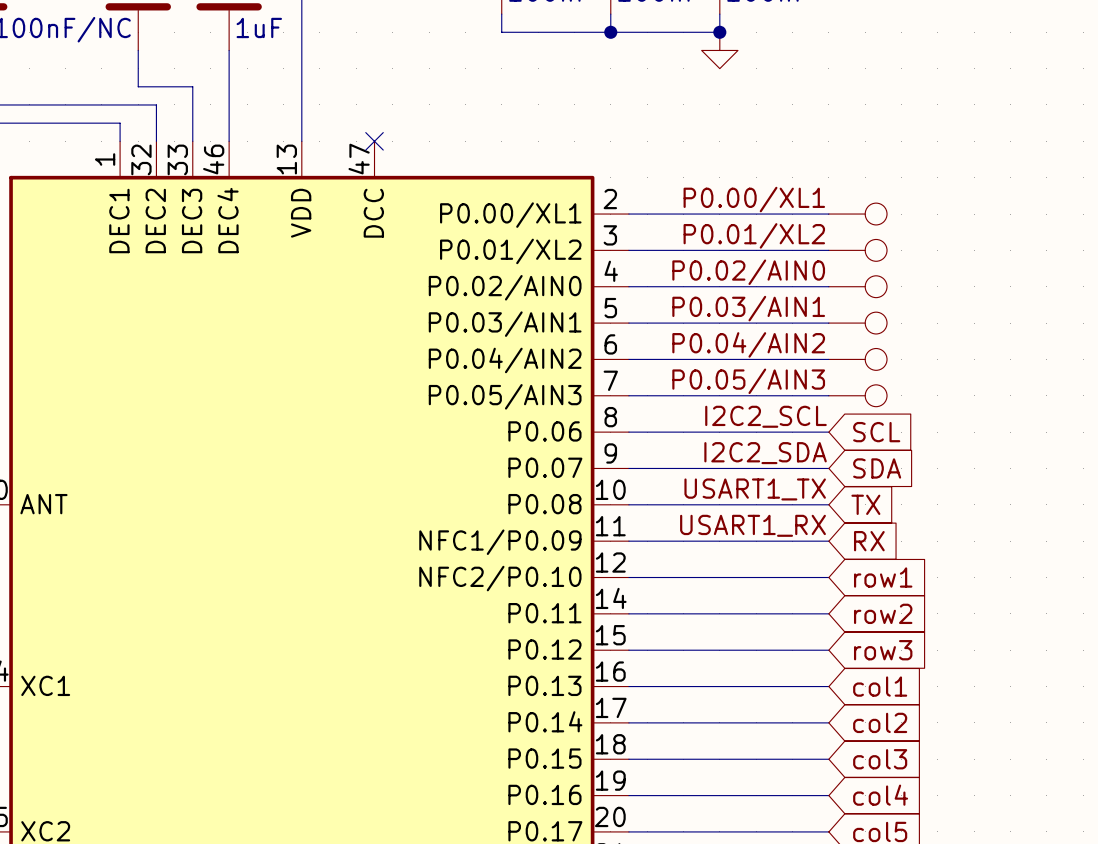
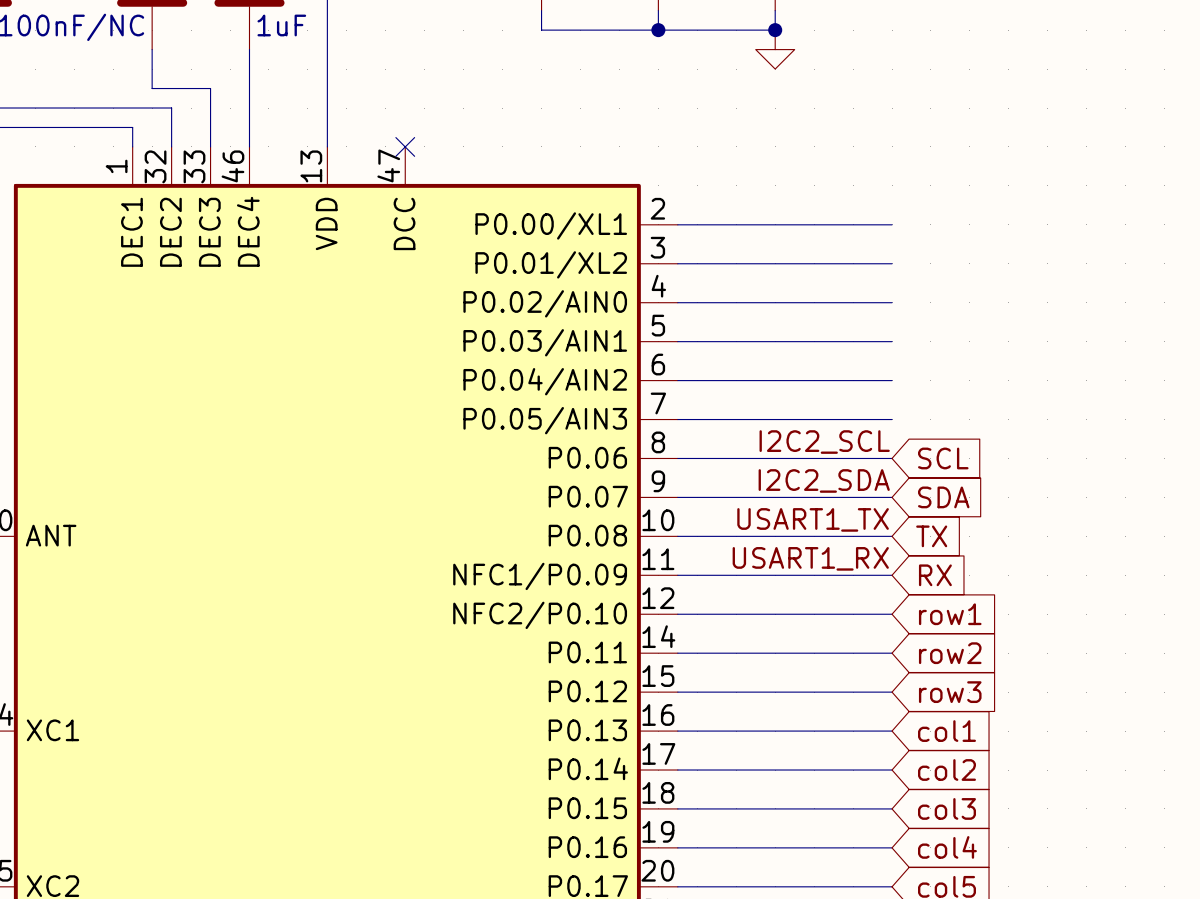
label: P0.00/XL1 (754, 199) -> none
part: (857, 214) -> none
label: P0.01/XL2 (754, 235) -> none
part: (857, 250) -> none
label: P0.02/AIN0 (748, 272) -> none
part: (857, 286) -> none
label: P0.03/AIN1 (748, 308) -> none
part: (857, 323) -> none
label: P0.04/AIN2 (748, 344) -> none
part: (857, 359) -> none
label: P0.05/AIN3 (748, 381) -> none
part: (857, 395) -> none

